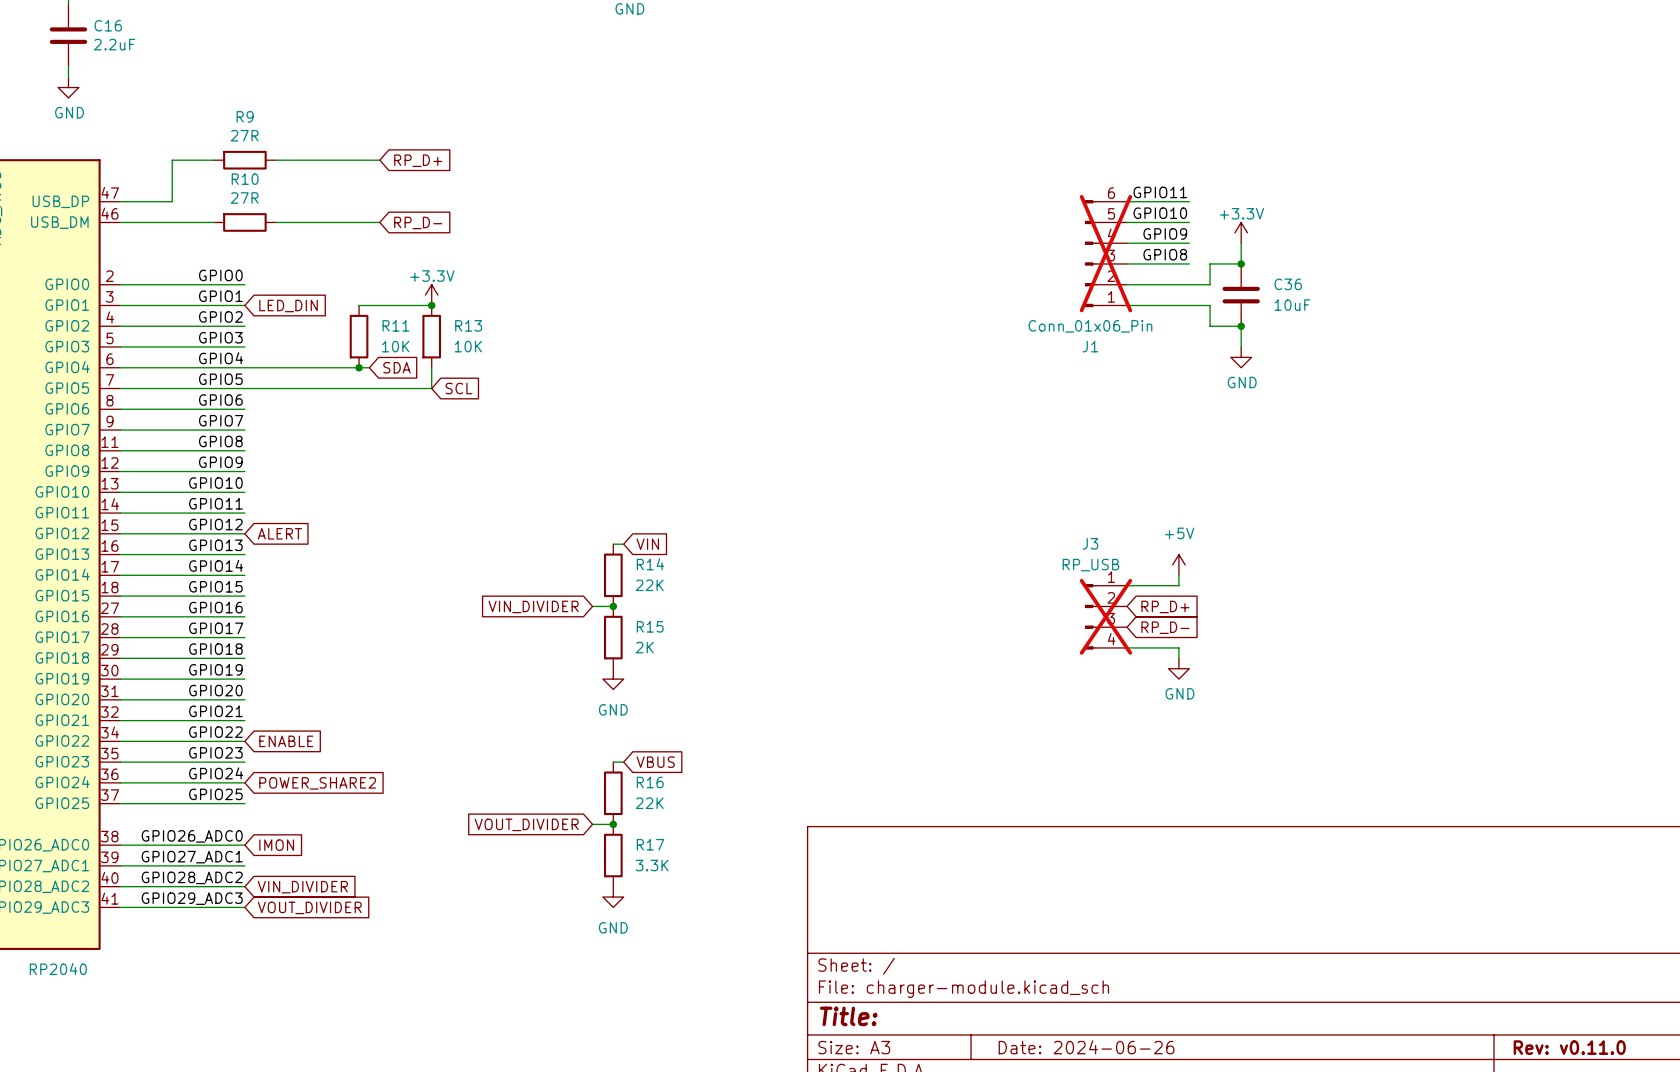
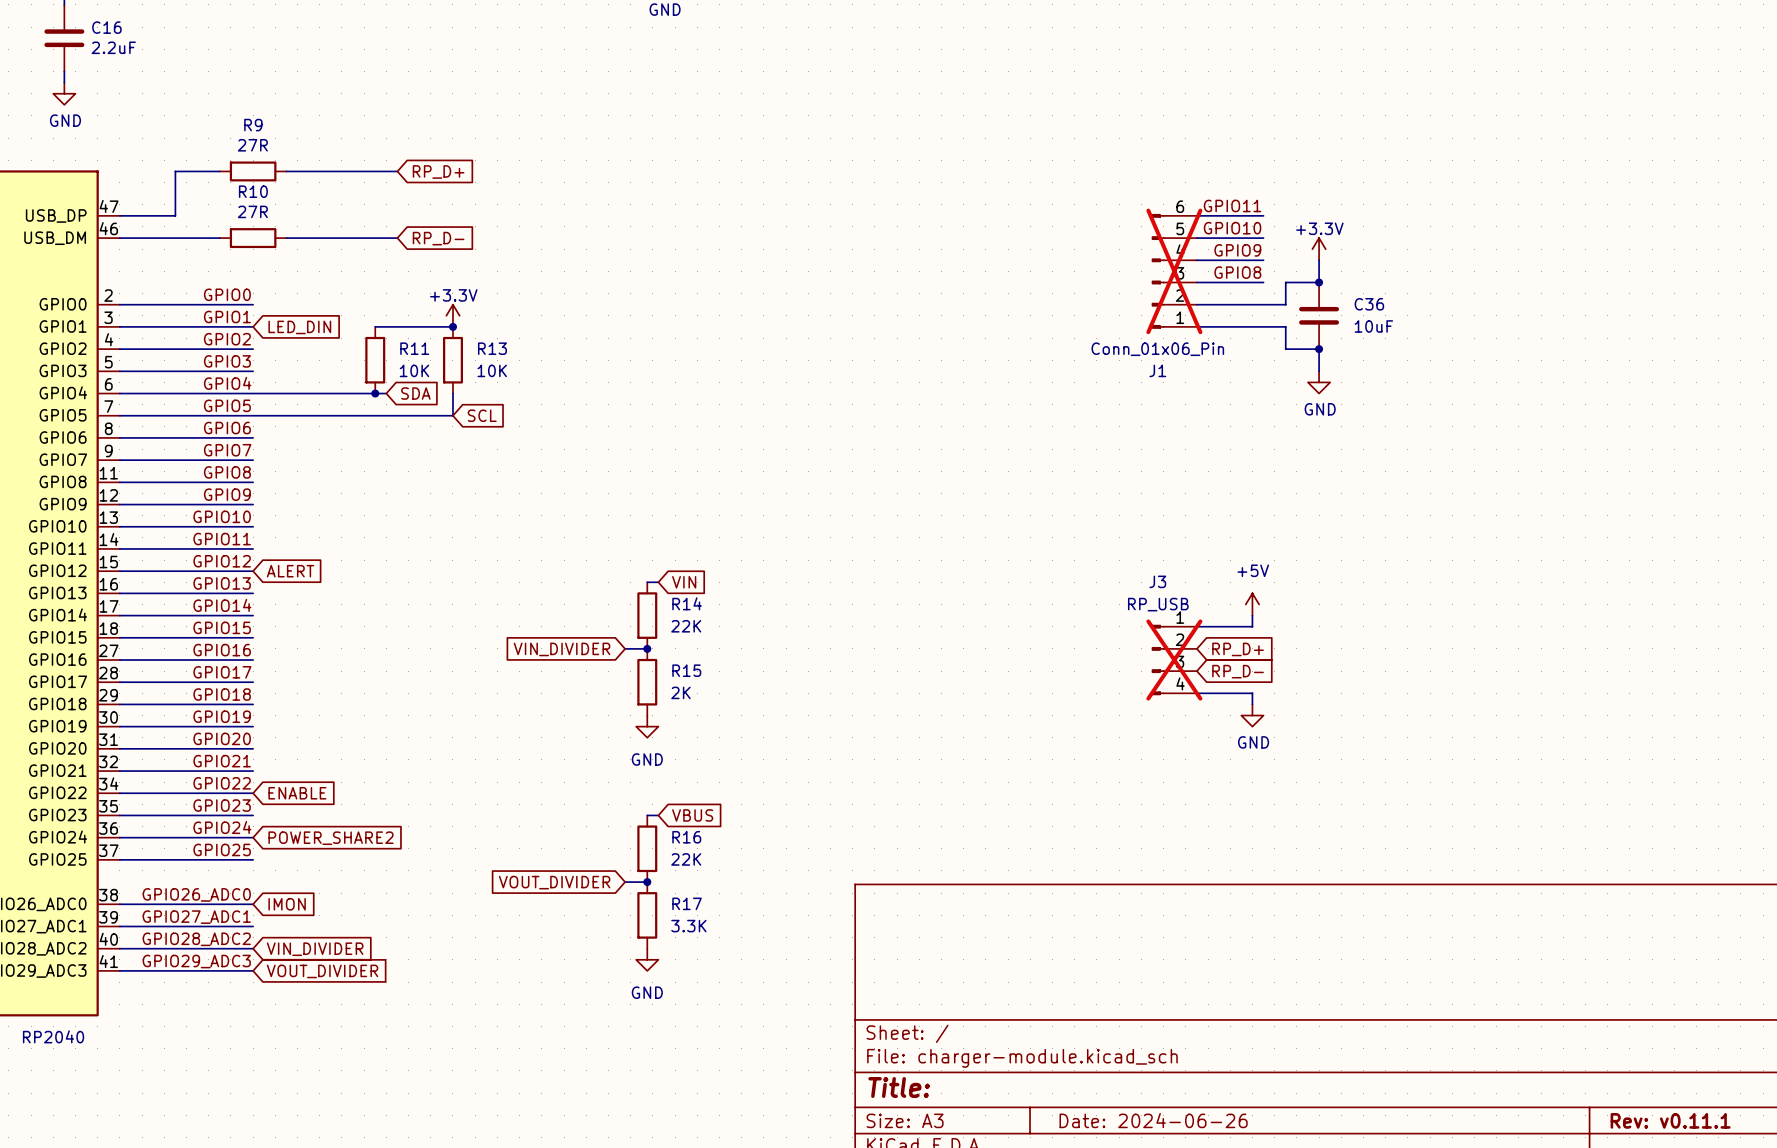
title block: Rev: v0.11.0 (1569, 1047) -> Rev: v0.11.1 (1670, 1120)

